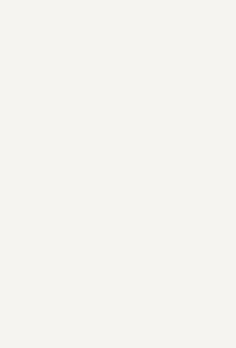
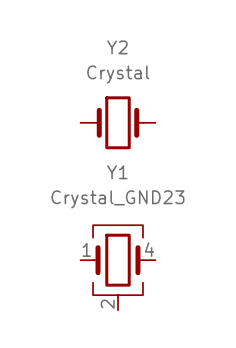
Y2: none -> Crystal (118, 122)
Y1: none -> Crystal_GND23 (118, 267)

